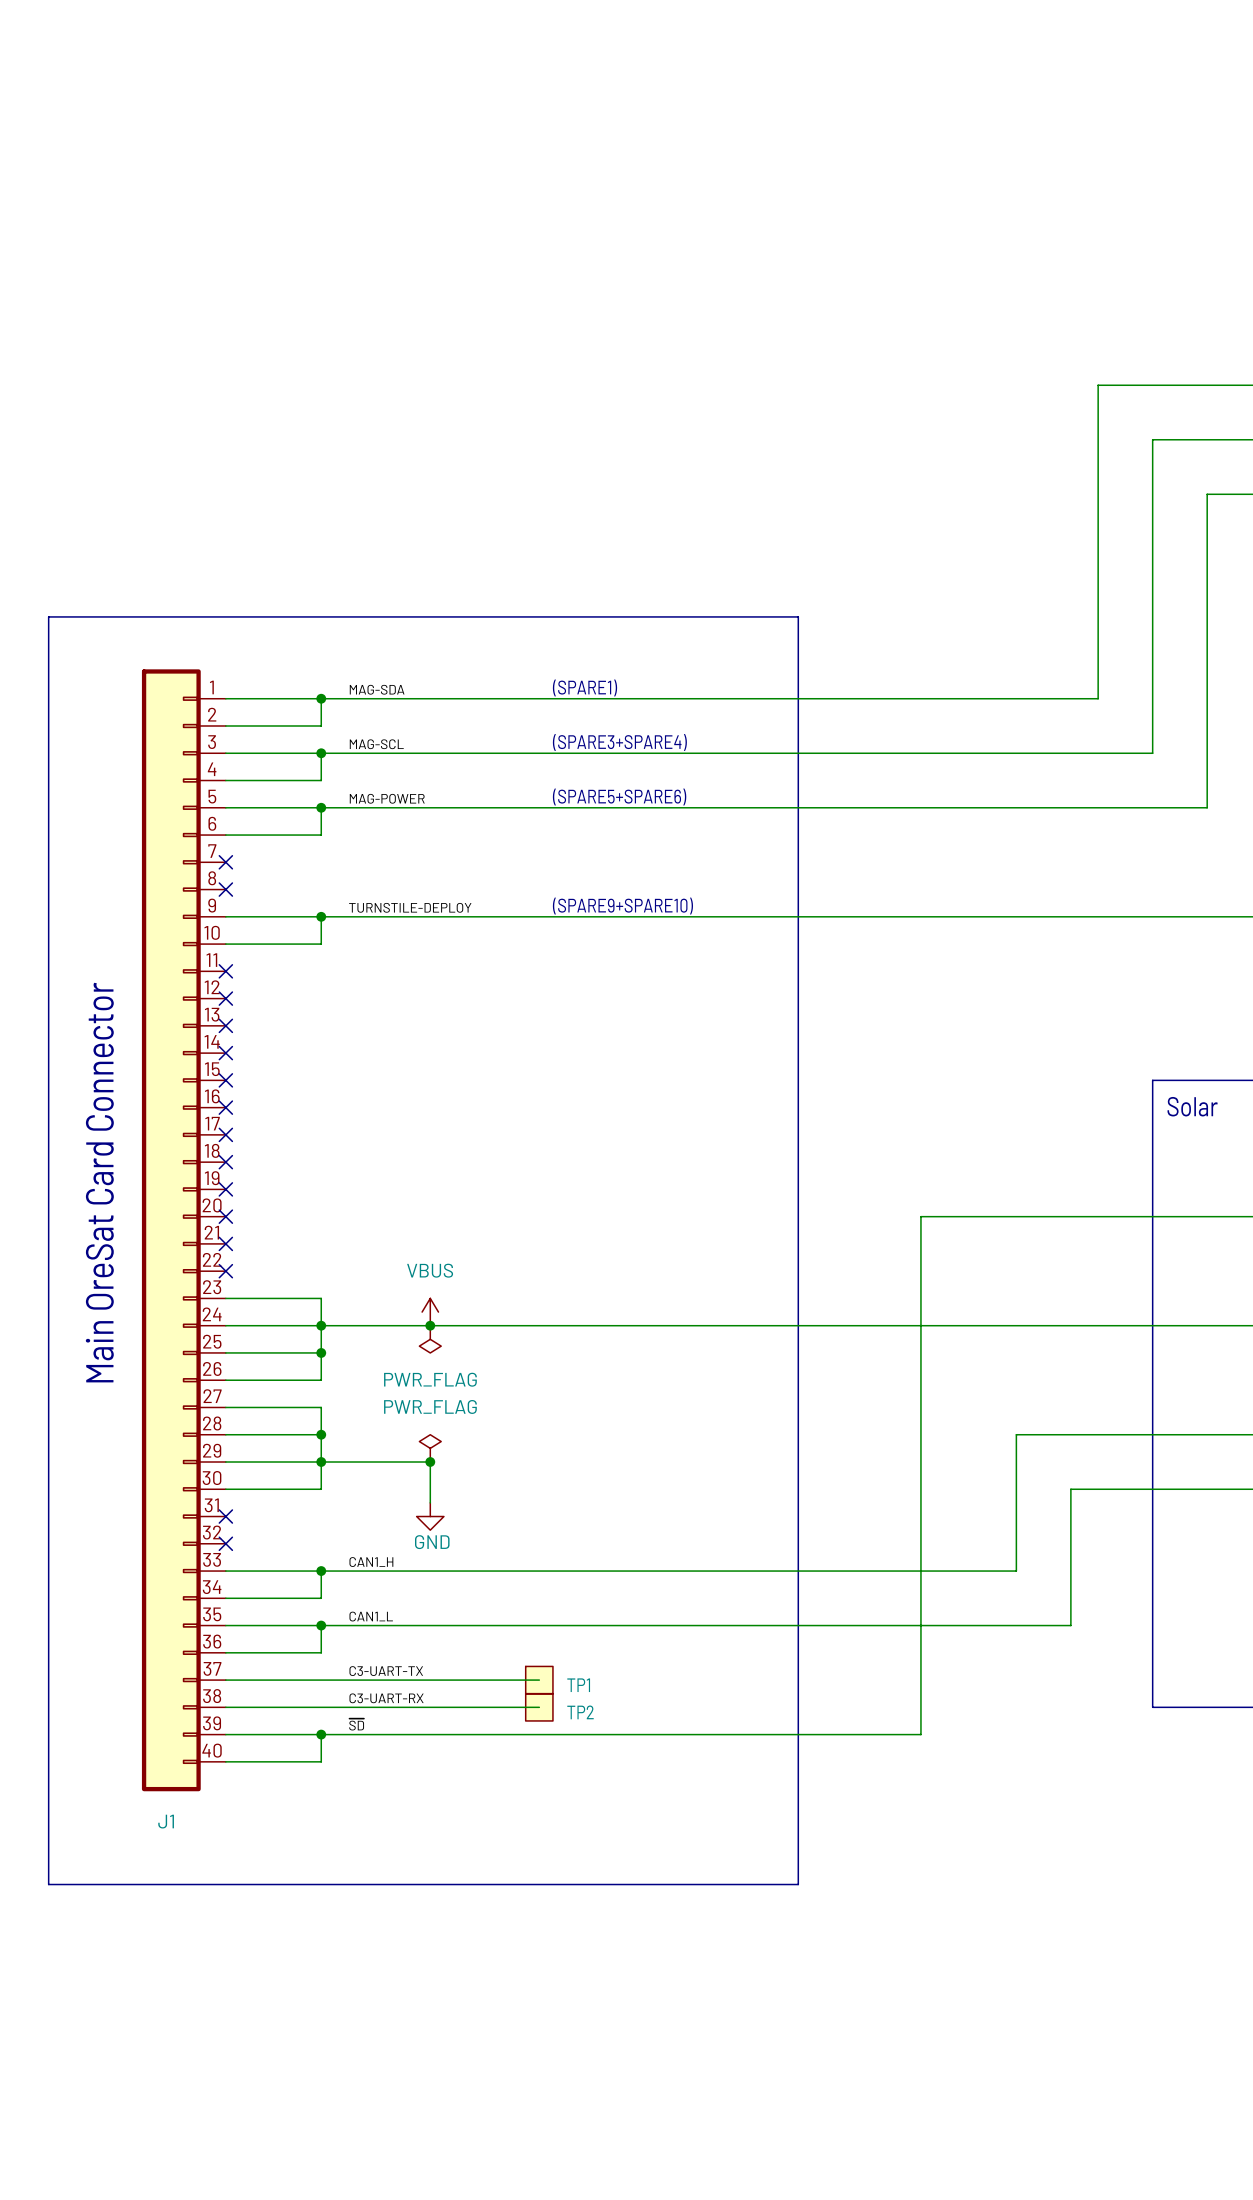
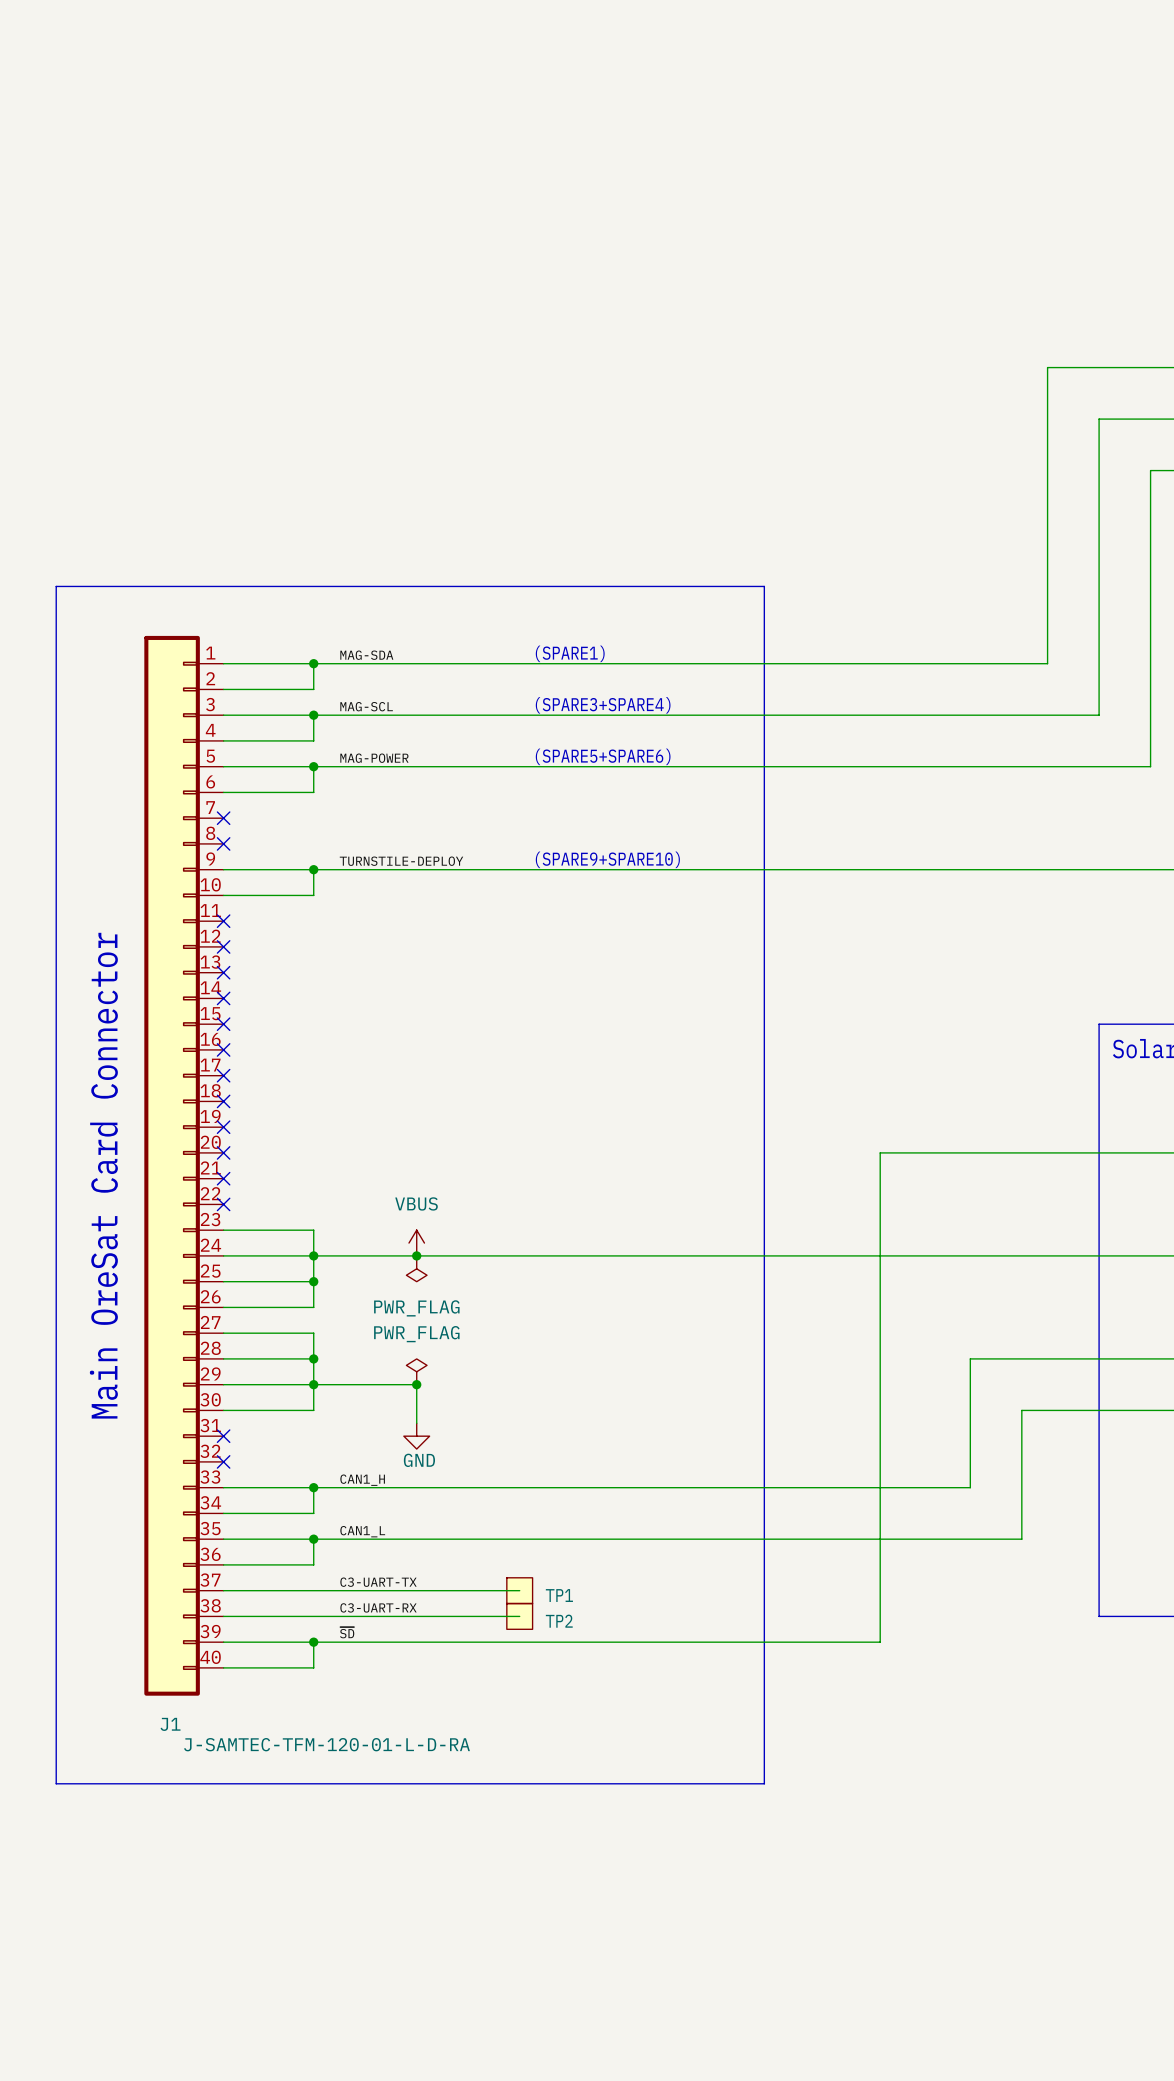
J1 value: none -> J-SAMTEC-TFM-120-01-L-D-RA (327, 1744)

